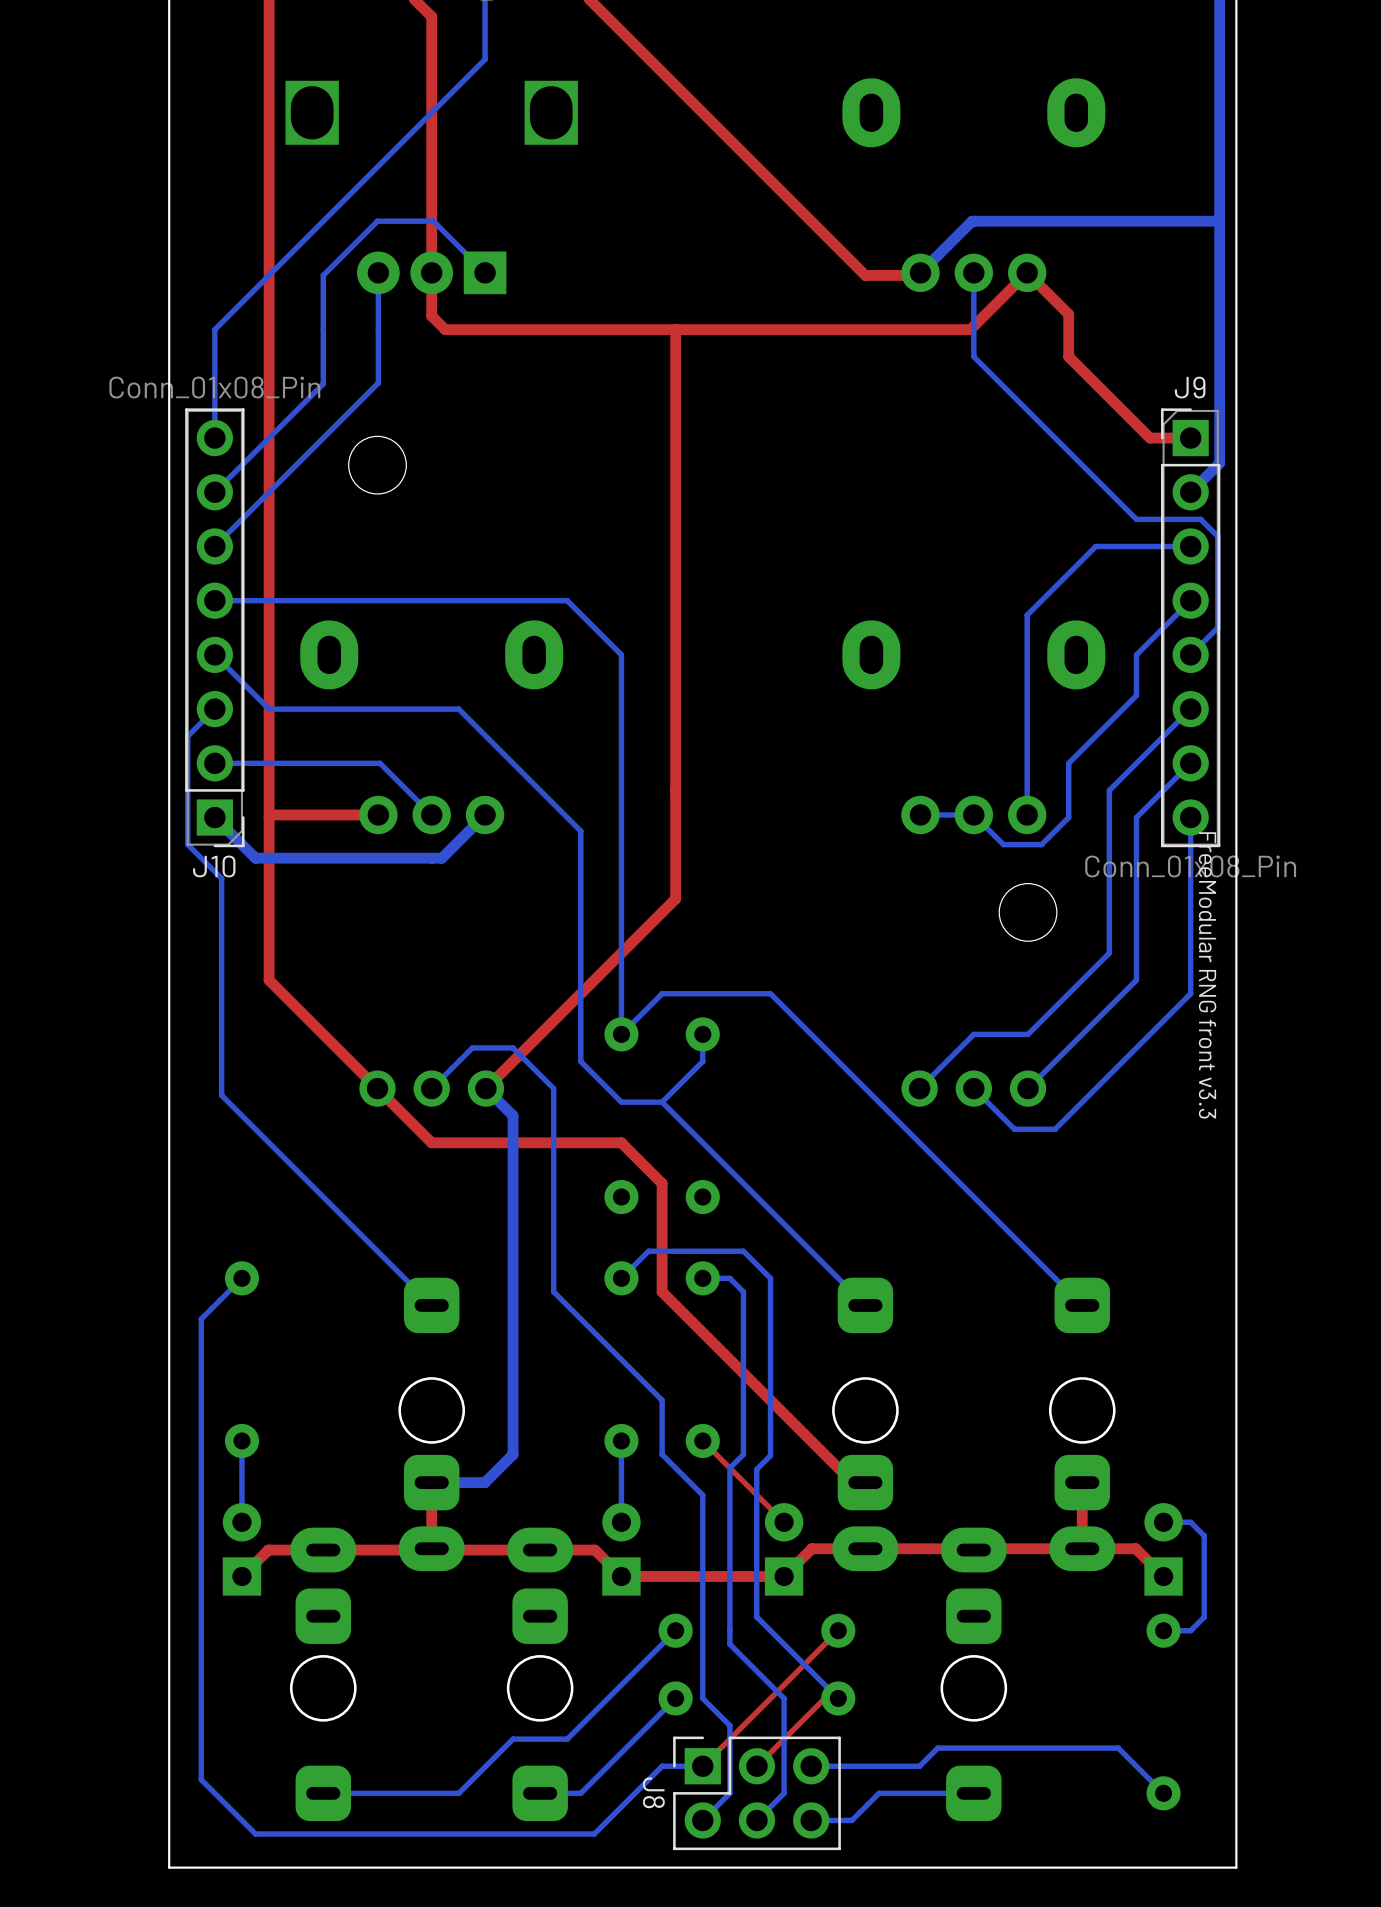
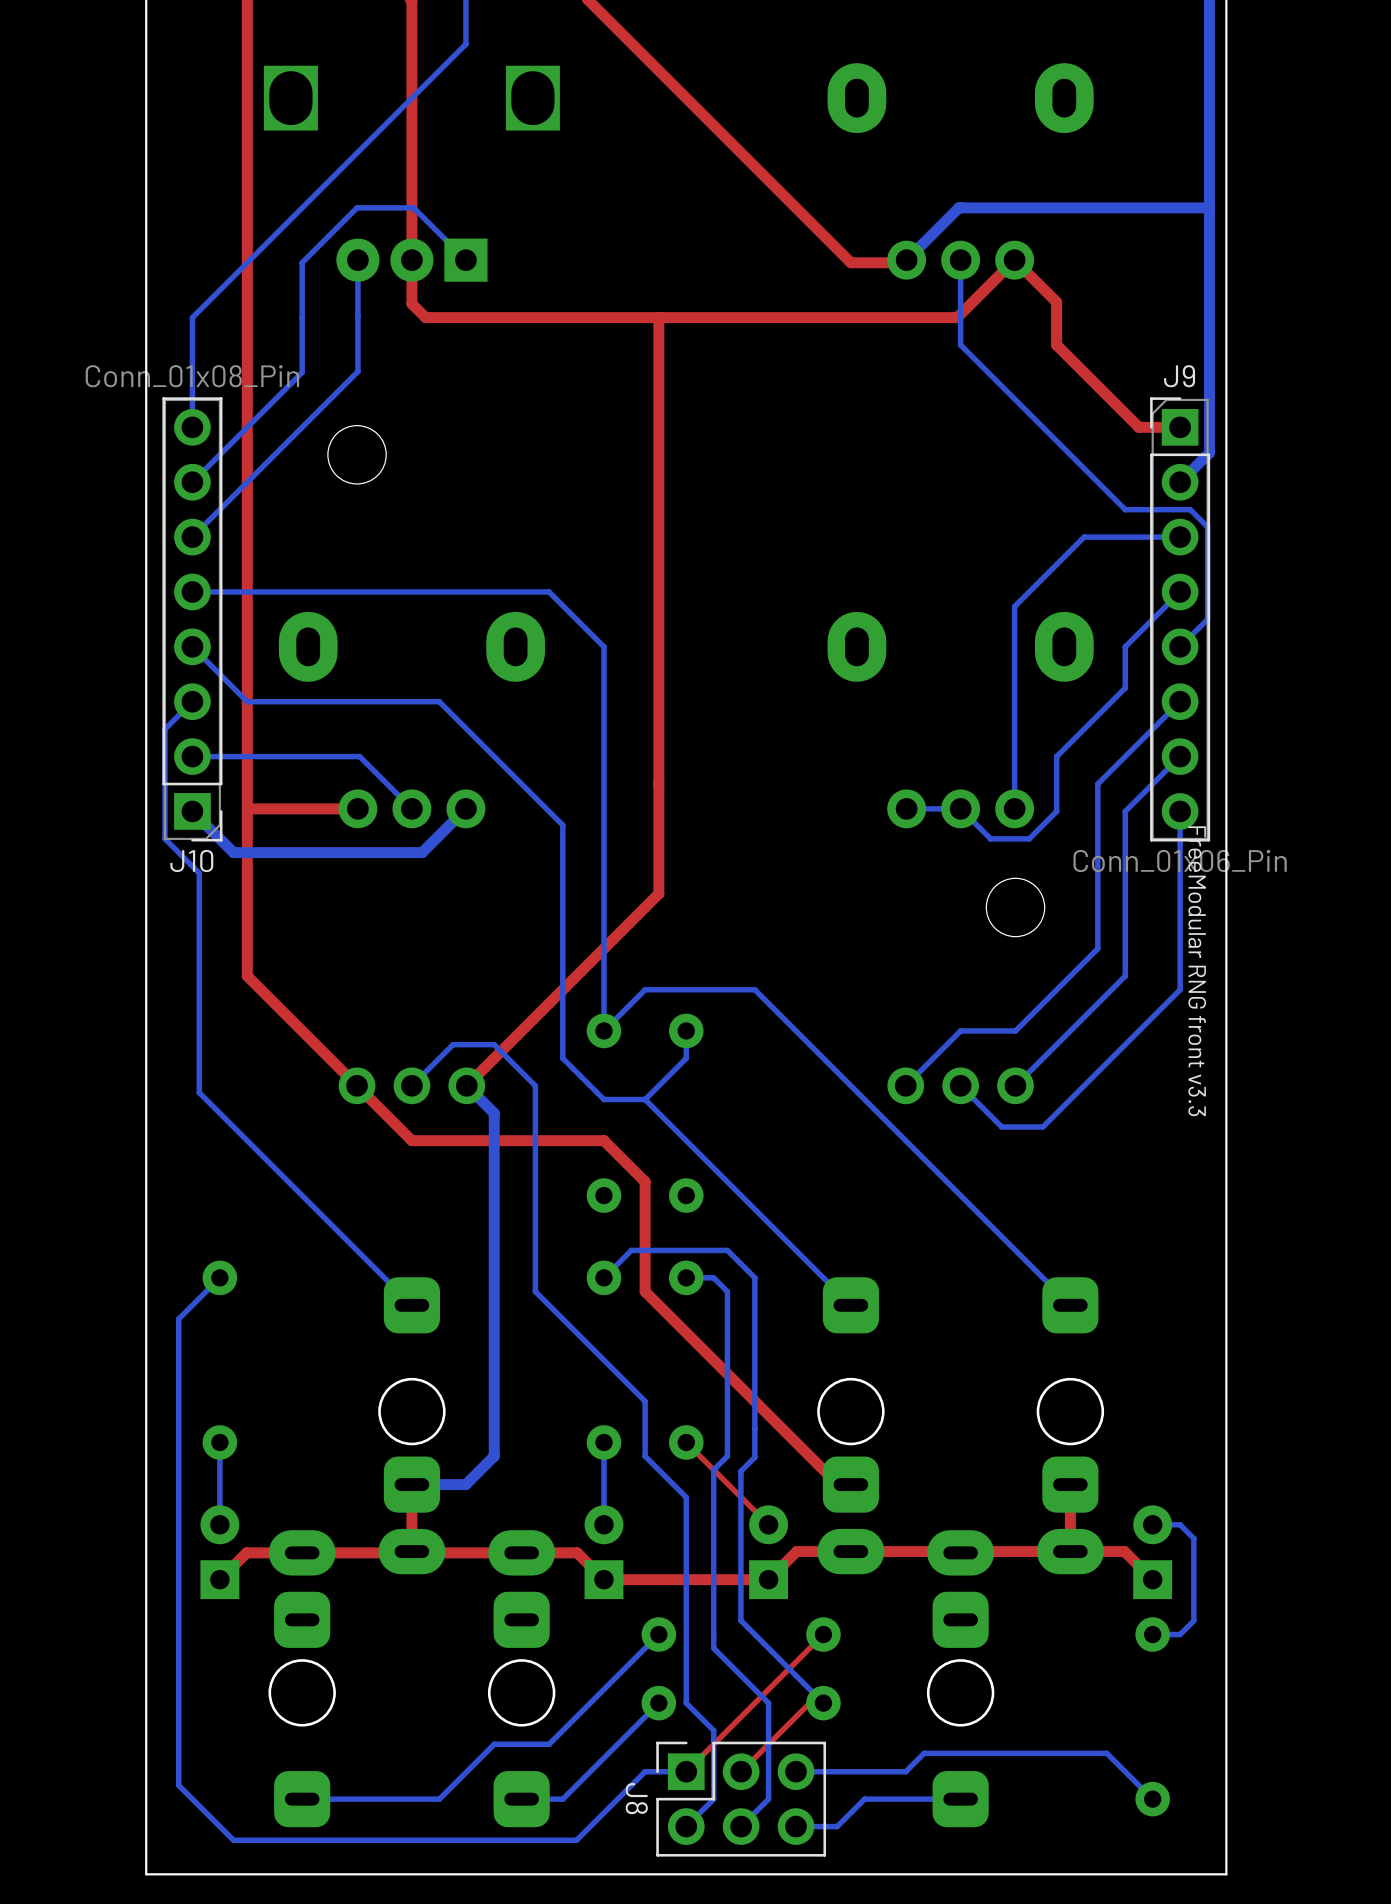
J9 value: Conn_01x08_Pin (1190, 866) -> Conn_01x06_Pin (1180, 860)

